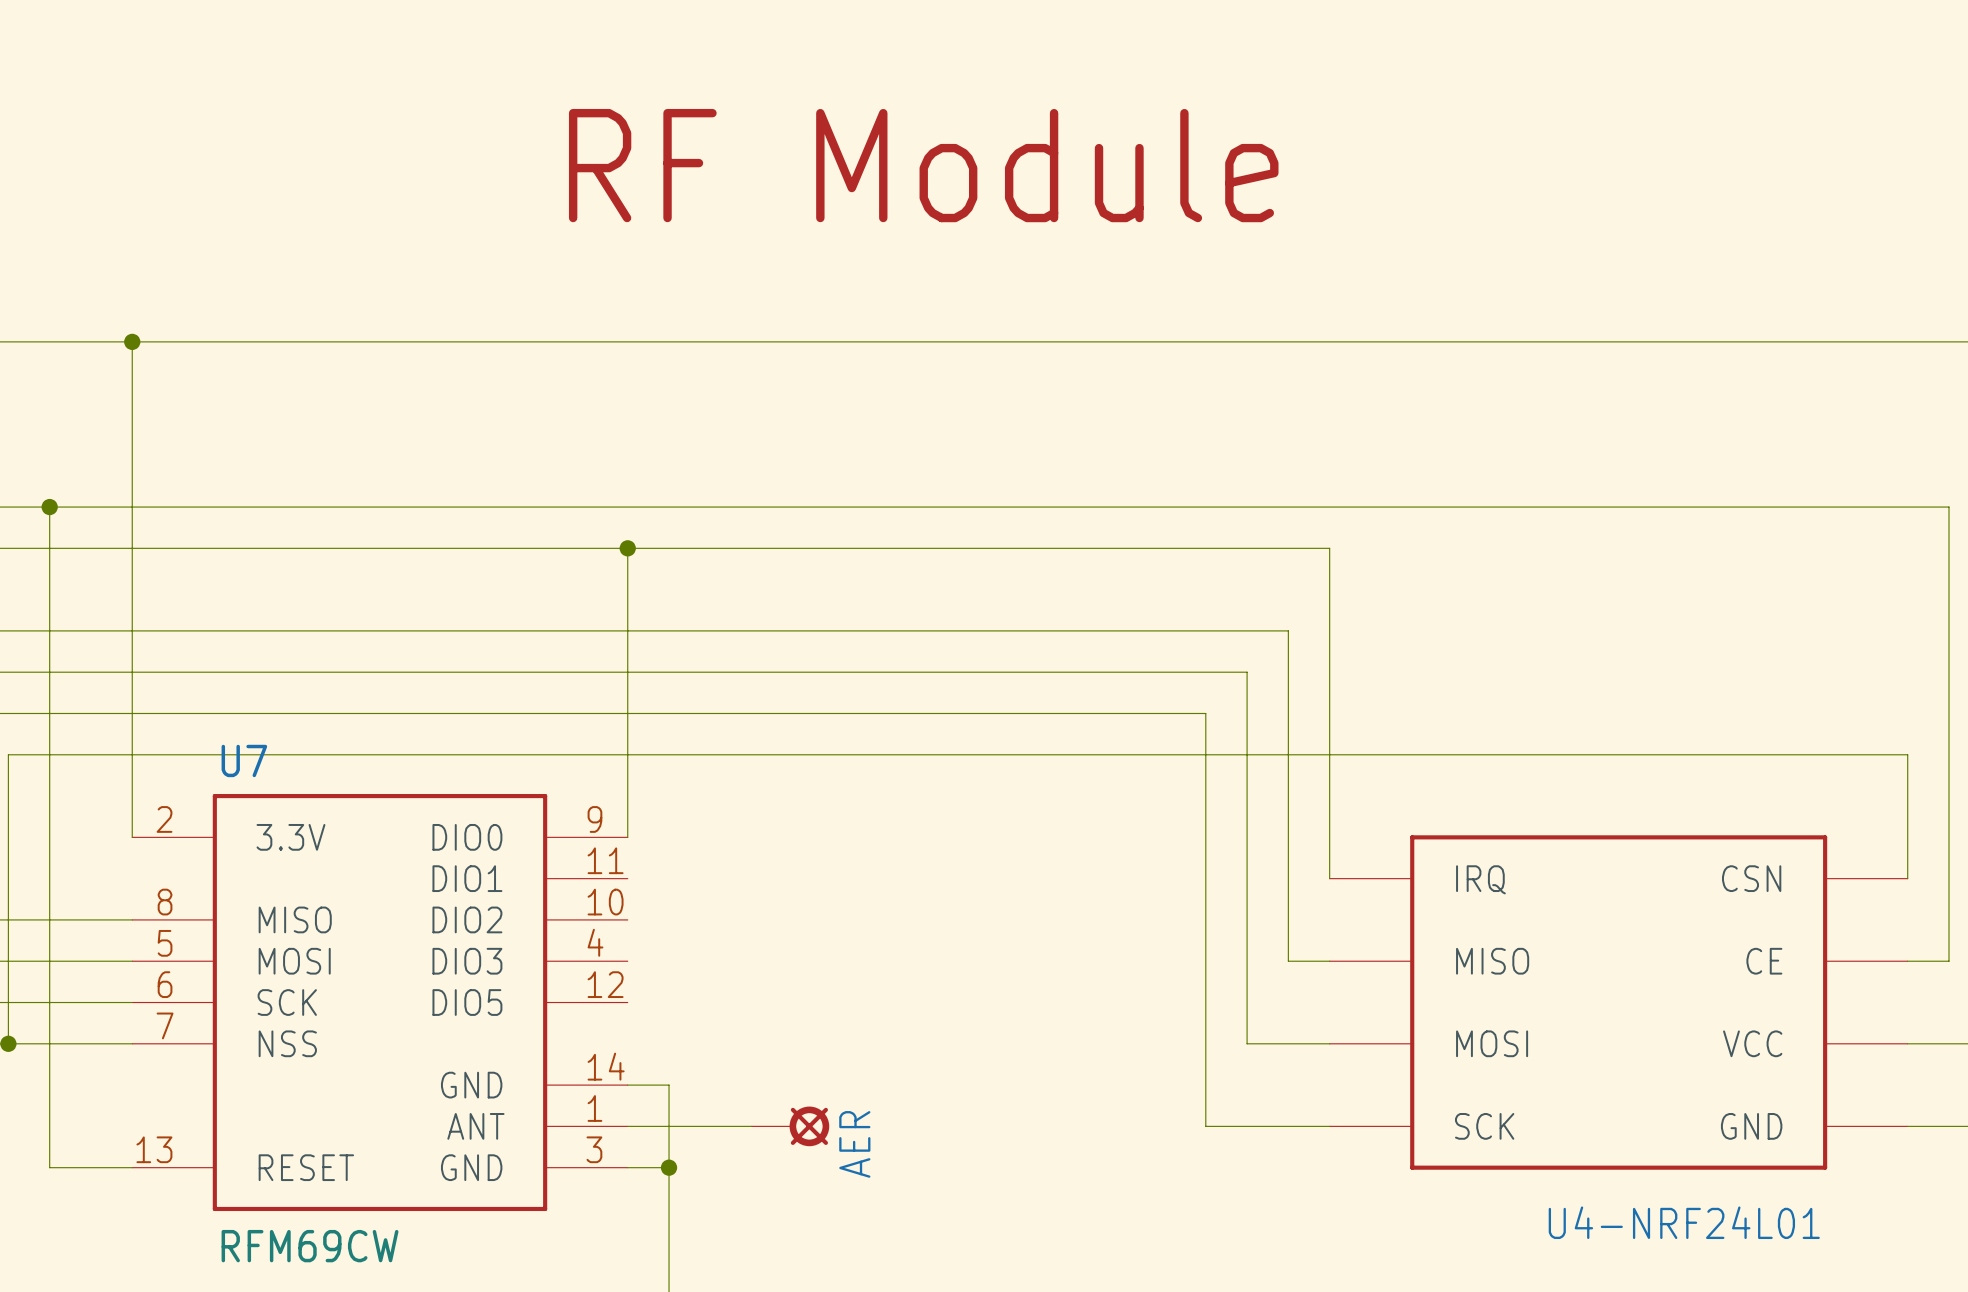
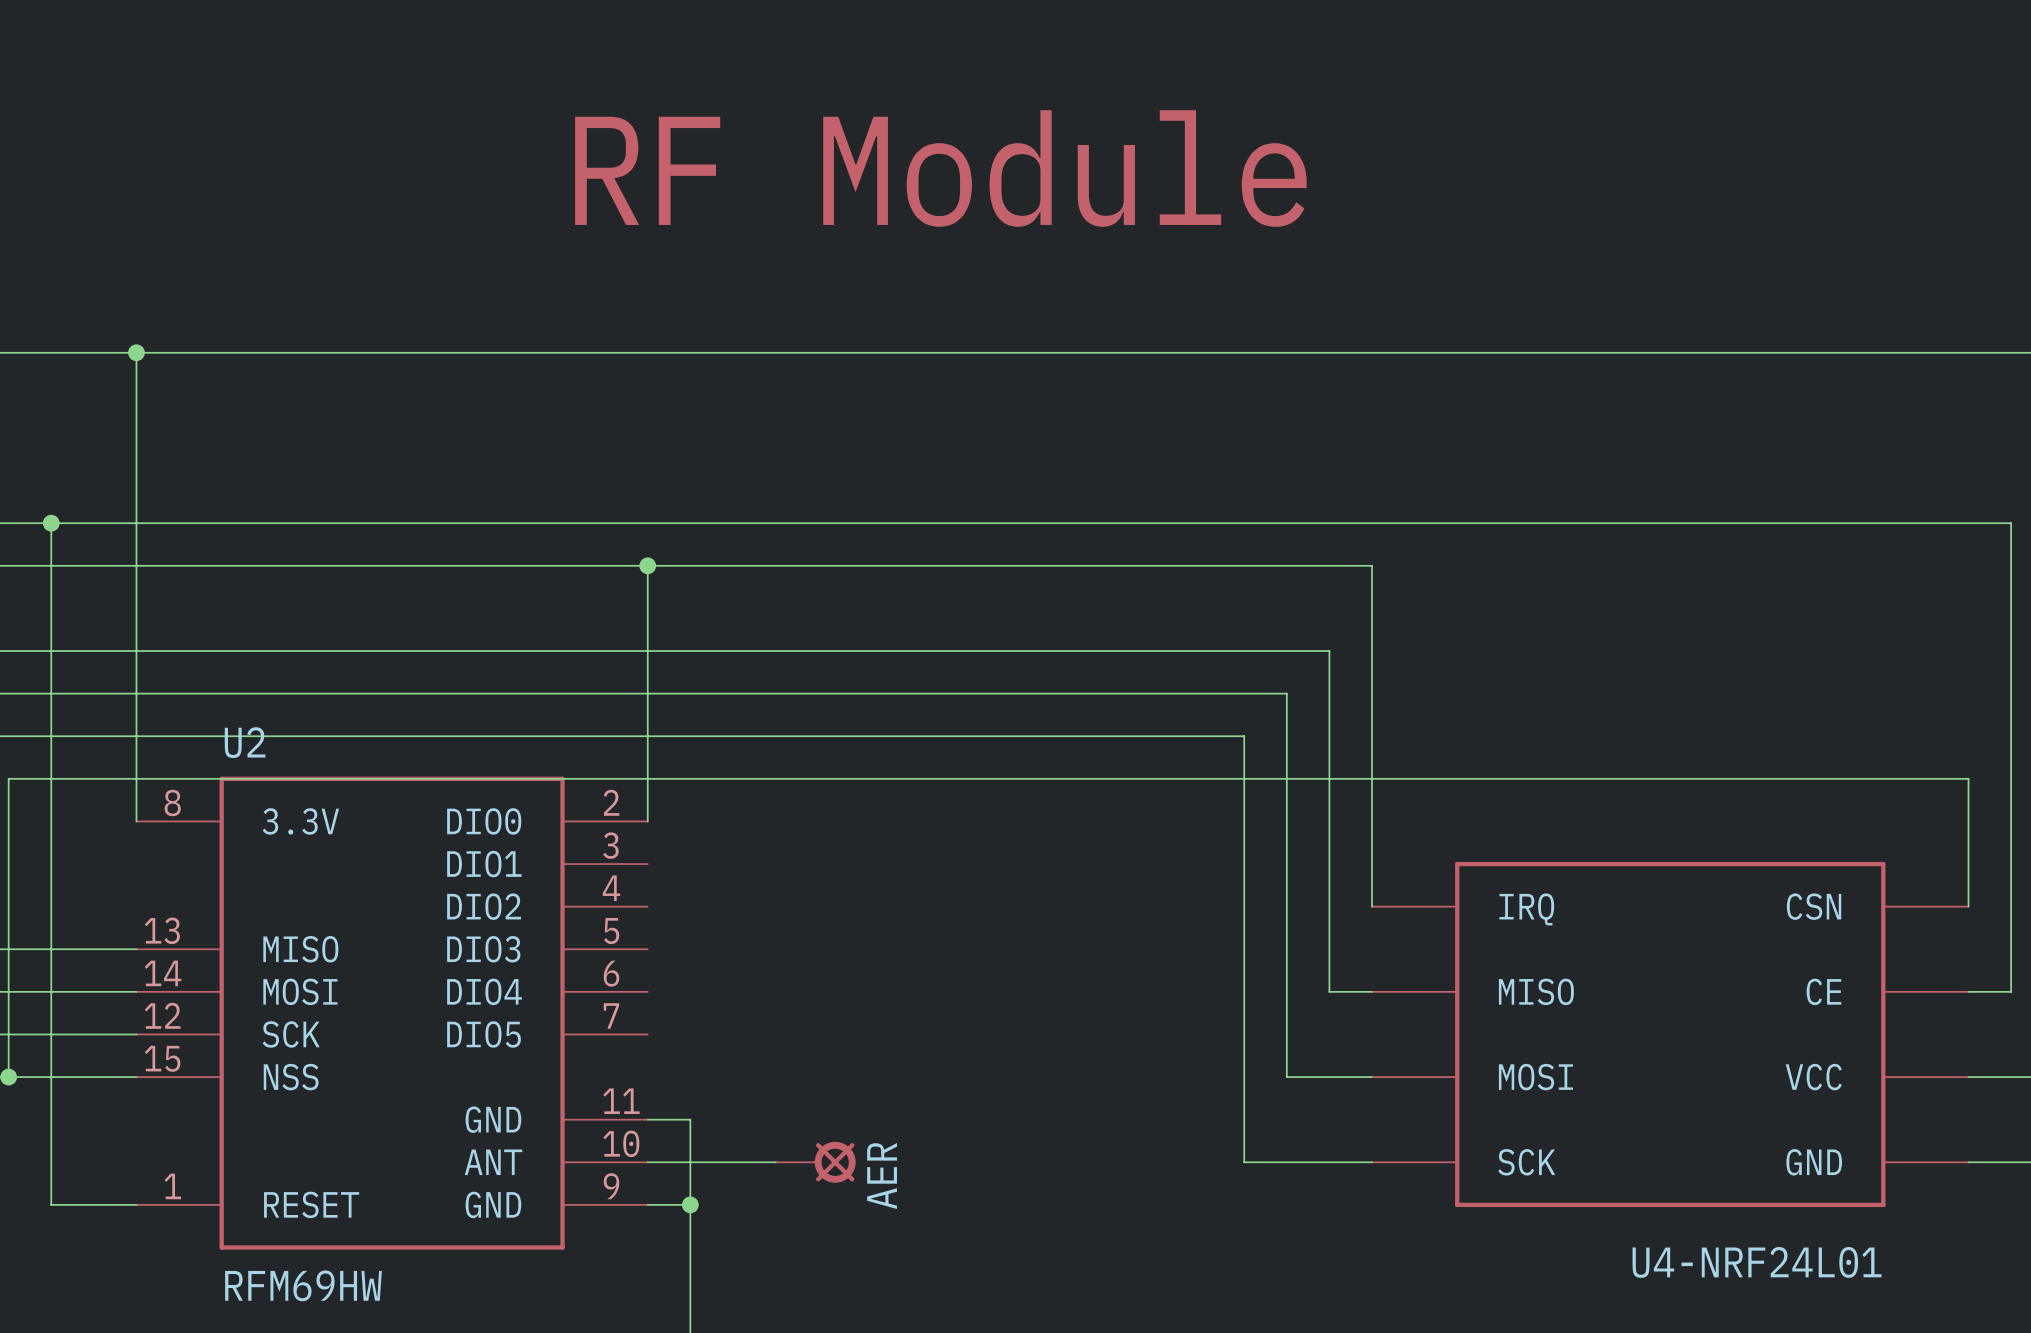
wire: (132, 796) (132, 837) -> none
wire: (627, 796) (627, 837) -> none
U2: none -> RFM69HW (392, 1013)
U7: RFM69CW (380, 1002) -> none

